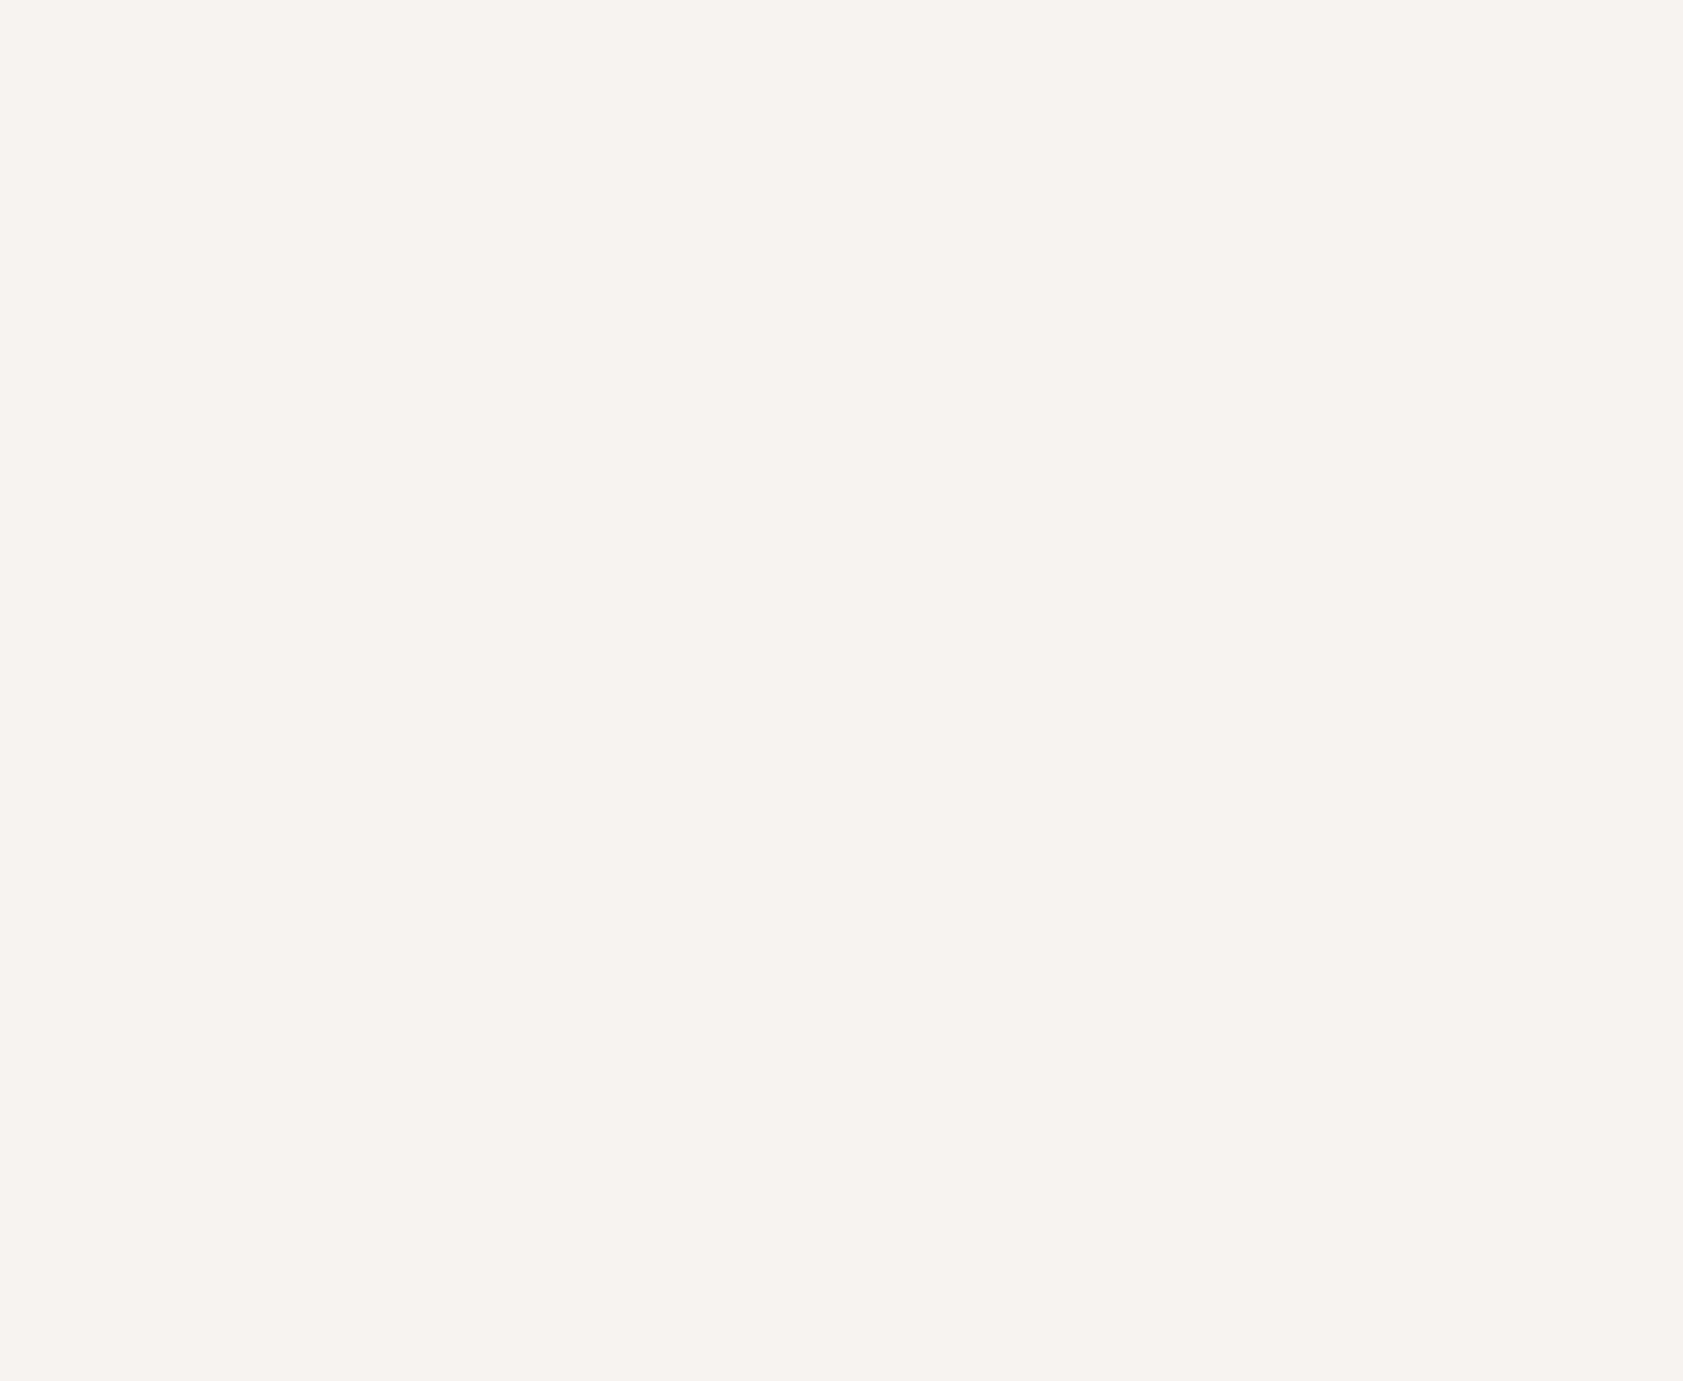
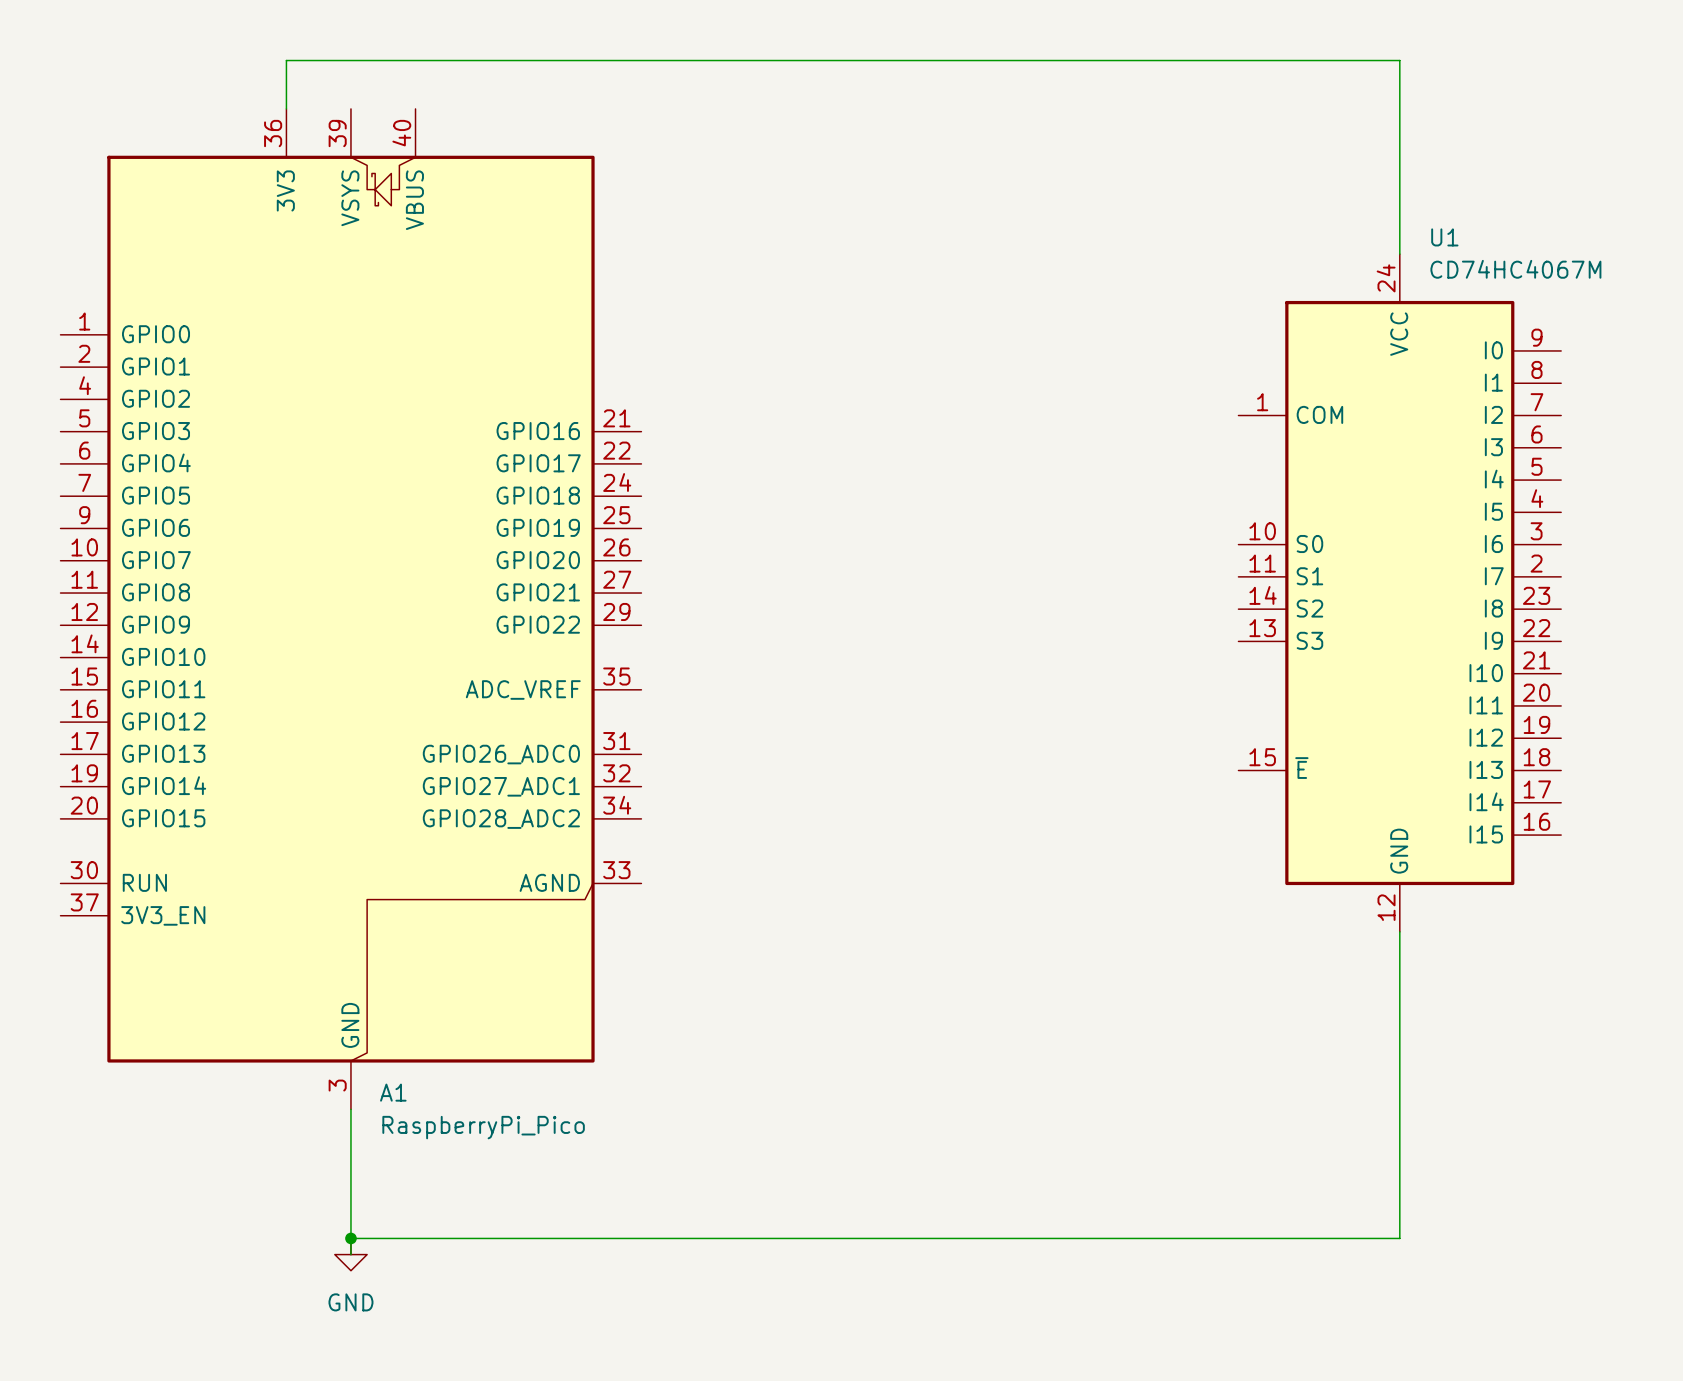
wire: none -> (286, 108) (286, 60) (1399, 60) (1399, 254)
U1: none -> CD74HC4067M (1399, 593)
A1: none -> RaspberryPi_Pico (350, 609)
wire: none -> (1399, 931) (1399, 1238) (350, 1238)
wire: none -> (350, 1109) (350, 1254)
junction: none -> (350, 1238)
power symbol: none -> GND (350, 1254)

